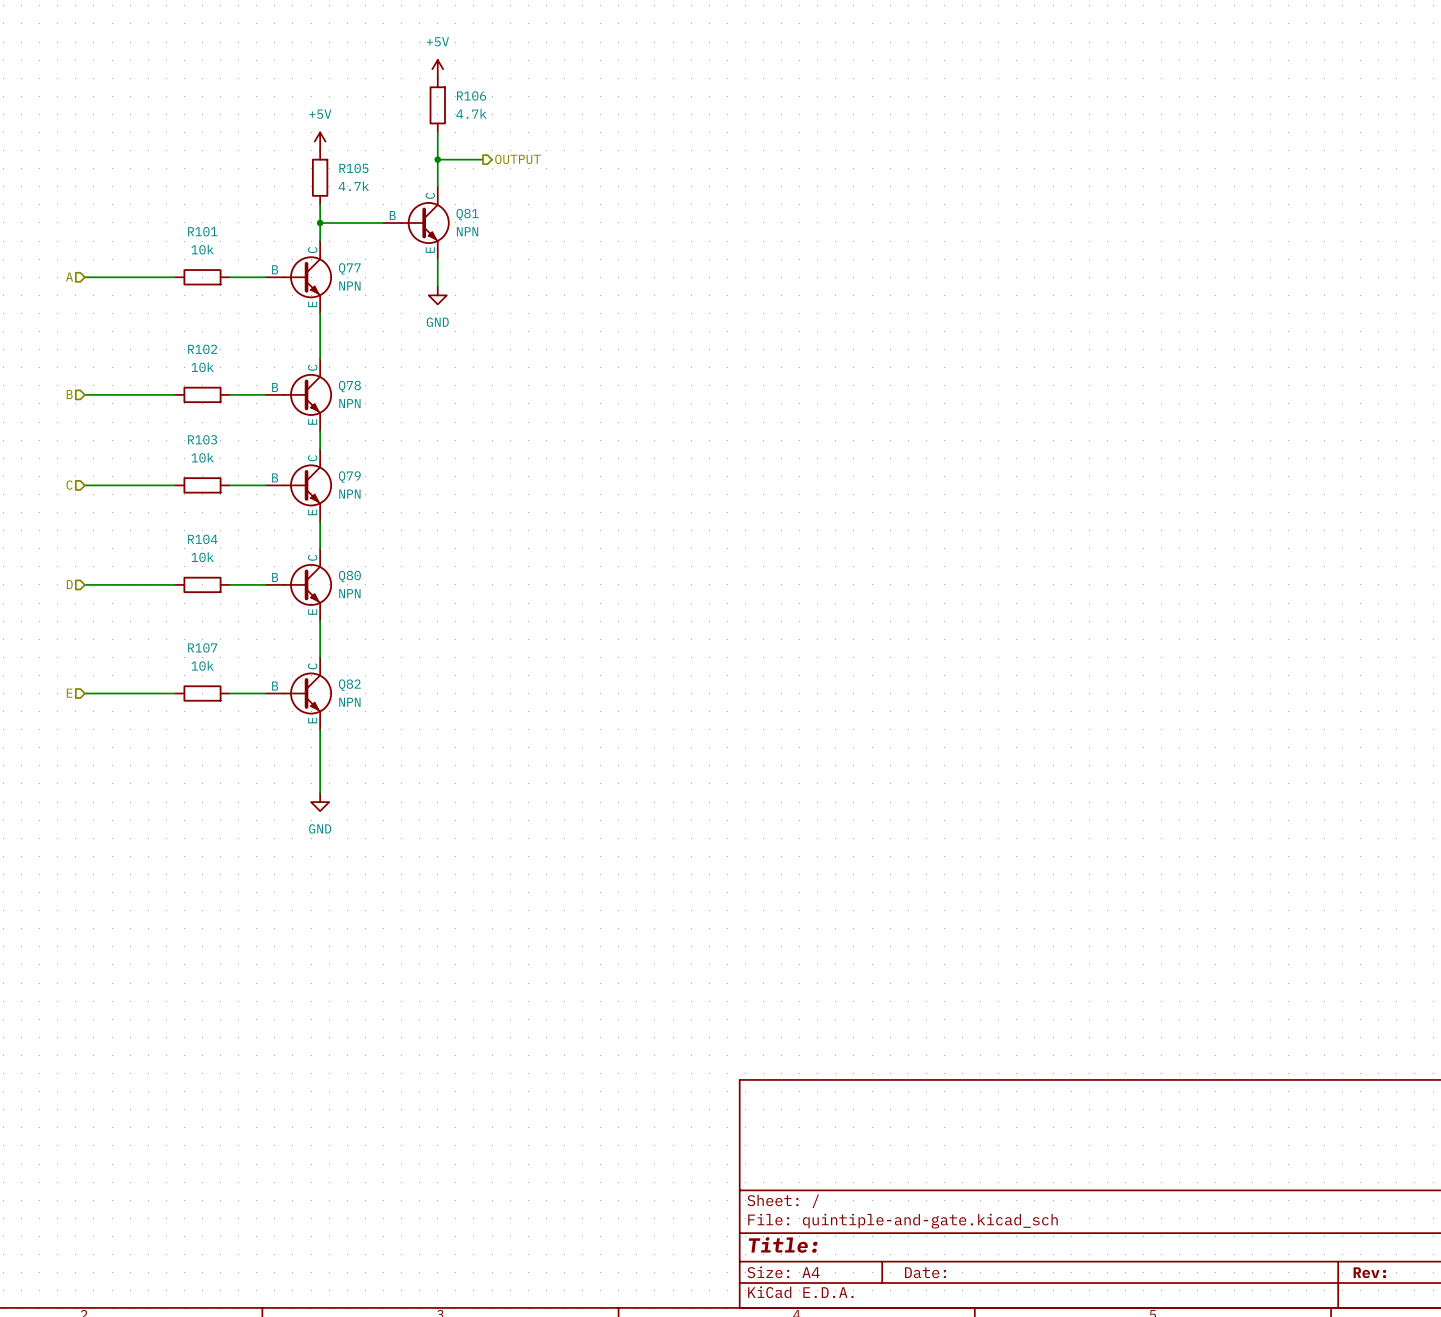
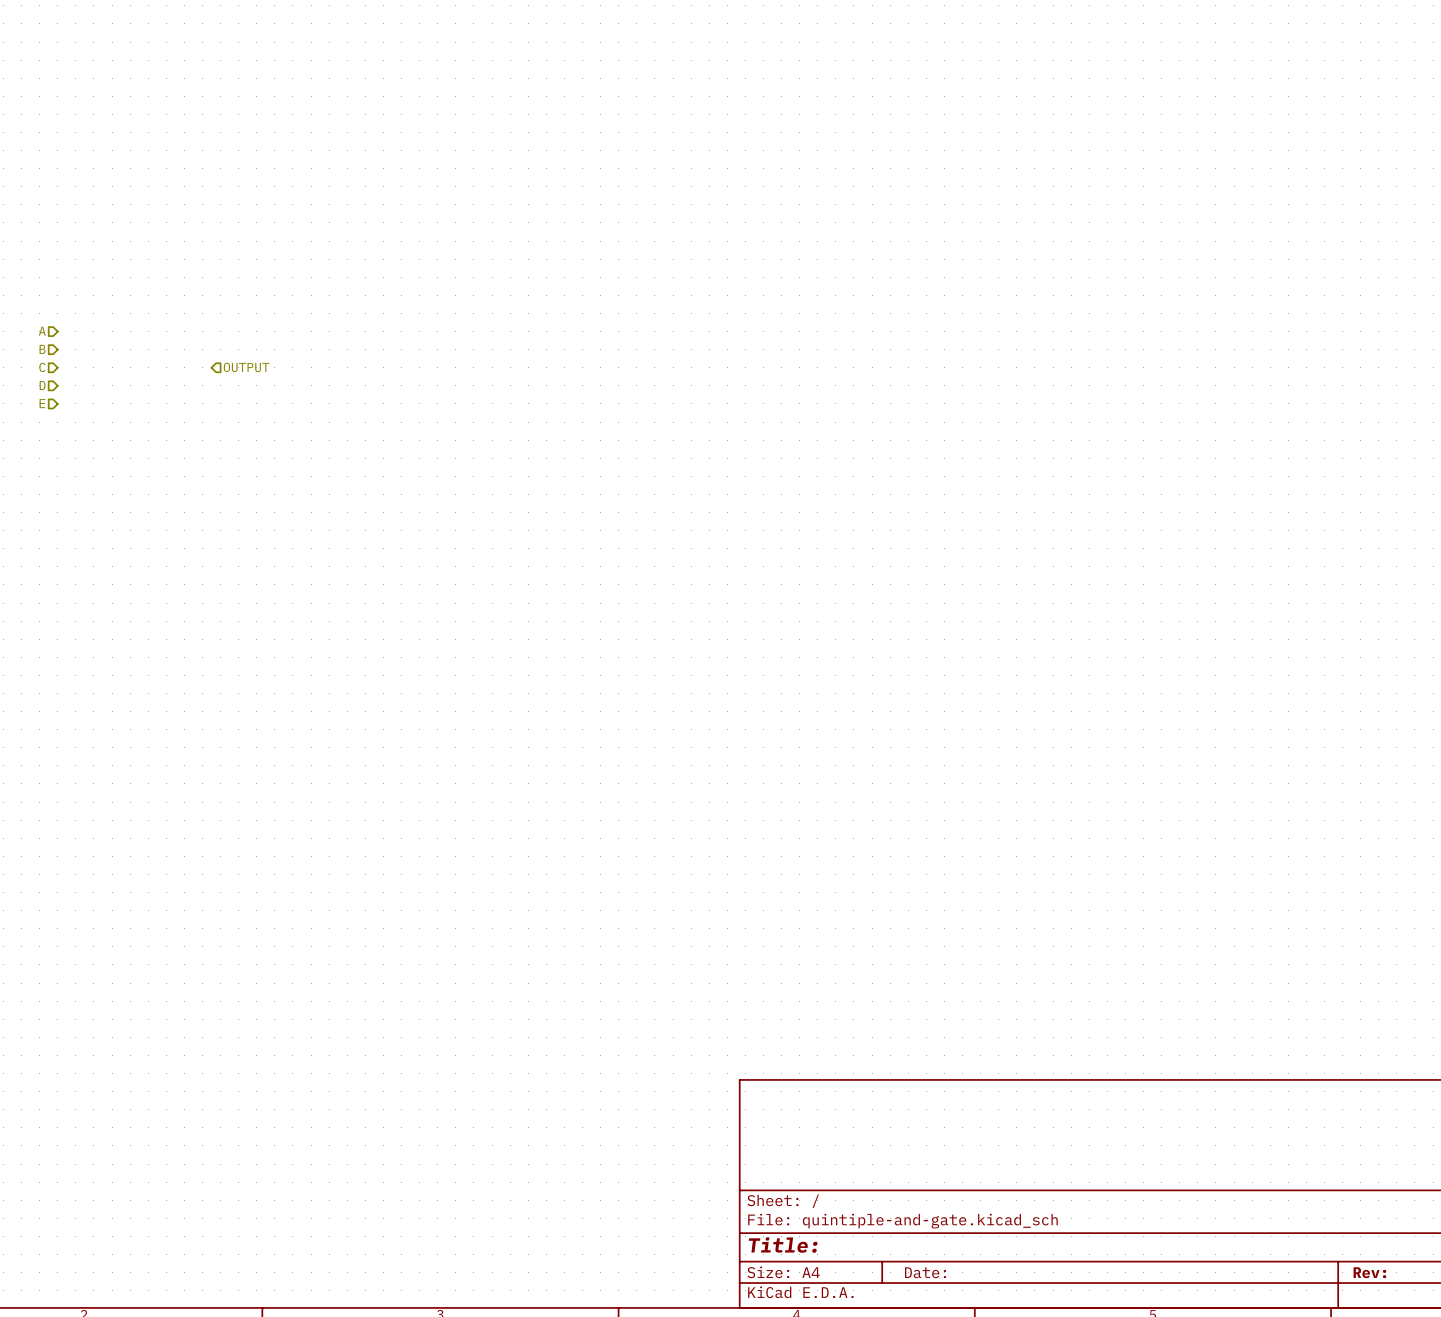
power symbol: +5V (437, 69) -> none
R106: 4.7k (437, 105) -> none
wire: (437, 132) (437, 186) -> none
power symbol: +5V (320, 141) -> none
wire: (437, 159) (483, 159) -> none
junction: (437, 159) -> none
hierarchical label: OUTPUT (518, 159) -> none
R105: 4.7k (320, 177) -> none
wire: (320, 204) (320, 241) -> none
wire: (320, 222) (383, 222) -> none
junction: (320, 222) -> none
Q81: NPN (416, 222) -> none
wire: (437, 259) (437, 286) -> none
hierarchical label position: A (69, 276) -> A (42, 331)
wire: (84, 277) (175, 277) -> none
R101: 10k (202, 277) -> none
wire: (229, 277) (265, 277) -> none
Q77: NPN (298, 277) -> none
power symbol: GND (437, 295) -> none
wire: (320, 313) (320, 358) -> none
hierarchical label: none -> OUTPUT (246, 367)
hierarchical label: none -> D (42, 385)
hierarchical label position: B (69, 394) -> B (42, 349)
wire: (84, 394) (175, 394) -> none
R102: 10k (202, 394) -> none
wire: (229, 394) (265, 394) -> none
Q78: NPN (298, 394) -> none
hierarchical label: none -> E (42, 403)
wire: (320, 431) (320, 449) -> none
hierarchical label position: C (69, 485) -> C (42, 367)
wire: (84, 485) (175, 485) -> none
R103: 10k (202, 485) -> none
wire: (229, 485) (265, 485) -> none
Q79: NPN (298, 485) -> none
wire: (320, 521) (320, 548) -> none
hierarchical label: D (69, 584) -> none
wire: (84, 584) (175, 584) -> none
R104: 10k (202, 584) -> none
wire: (229, 584) (265, 584) -> none
Q80: NPN (298, 584) -> none
wire: (320, 621) (320, 657) -> none
hierarchical label: E (69, 693) -> none
wire: (84, 693) (175, 693) -> none
R107: 10k (202, 693) -> none
wire: (229, 693) (265, 693) -> none
Q82: NPN (298, 693) -> none
wire: (320, 729) (320, 793) -> none
power symbol: GND (320, 802) -> none

